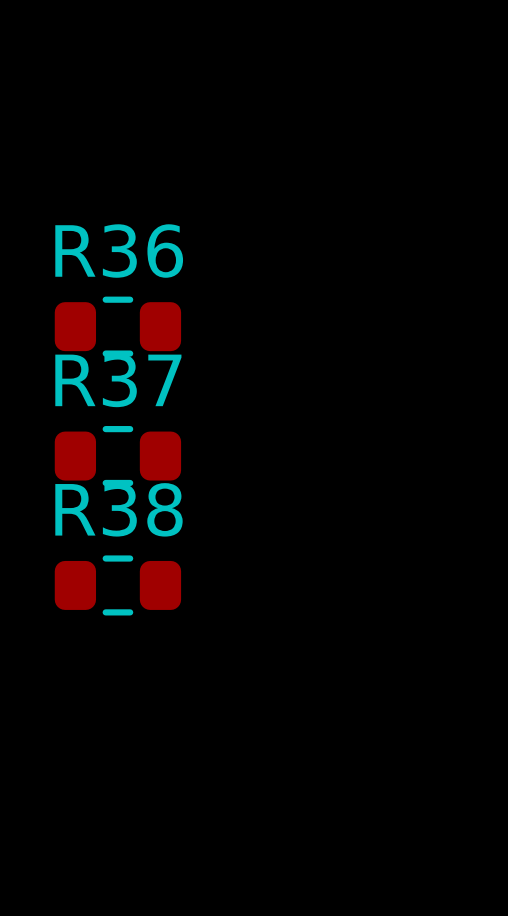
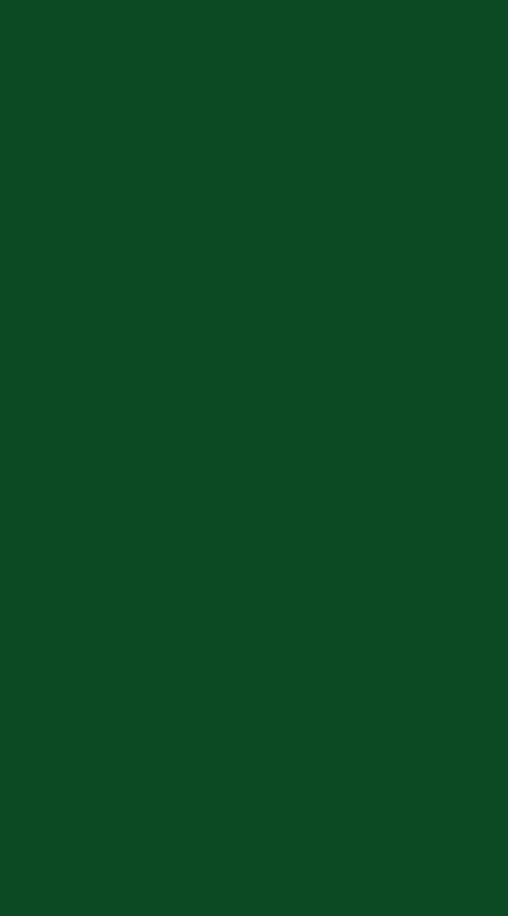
R36: (117, 326) -> none
R37: (117, 456) -> none
R38: (117, 585) -> none

